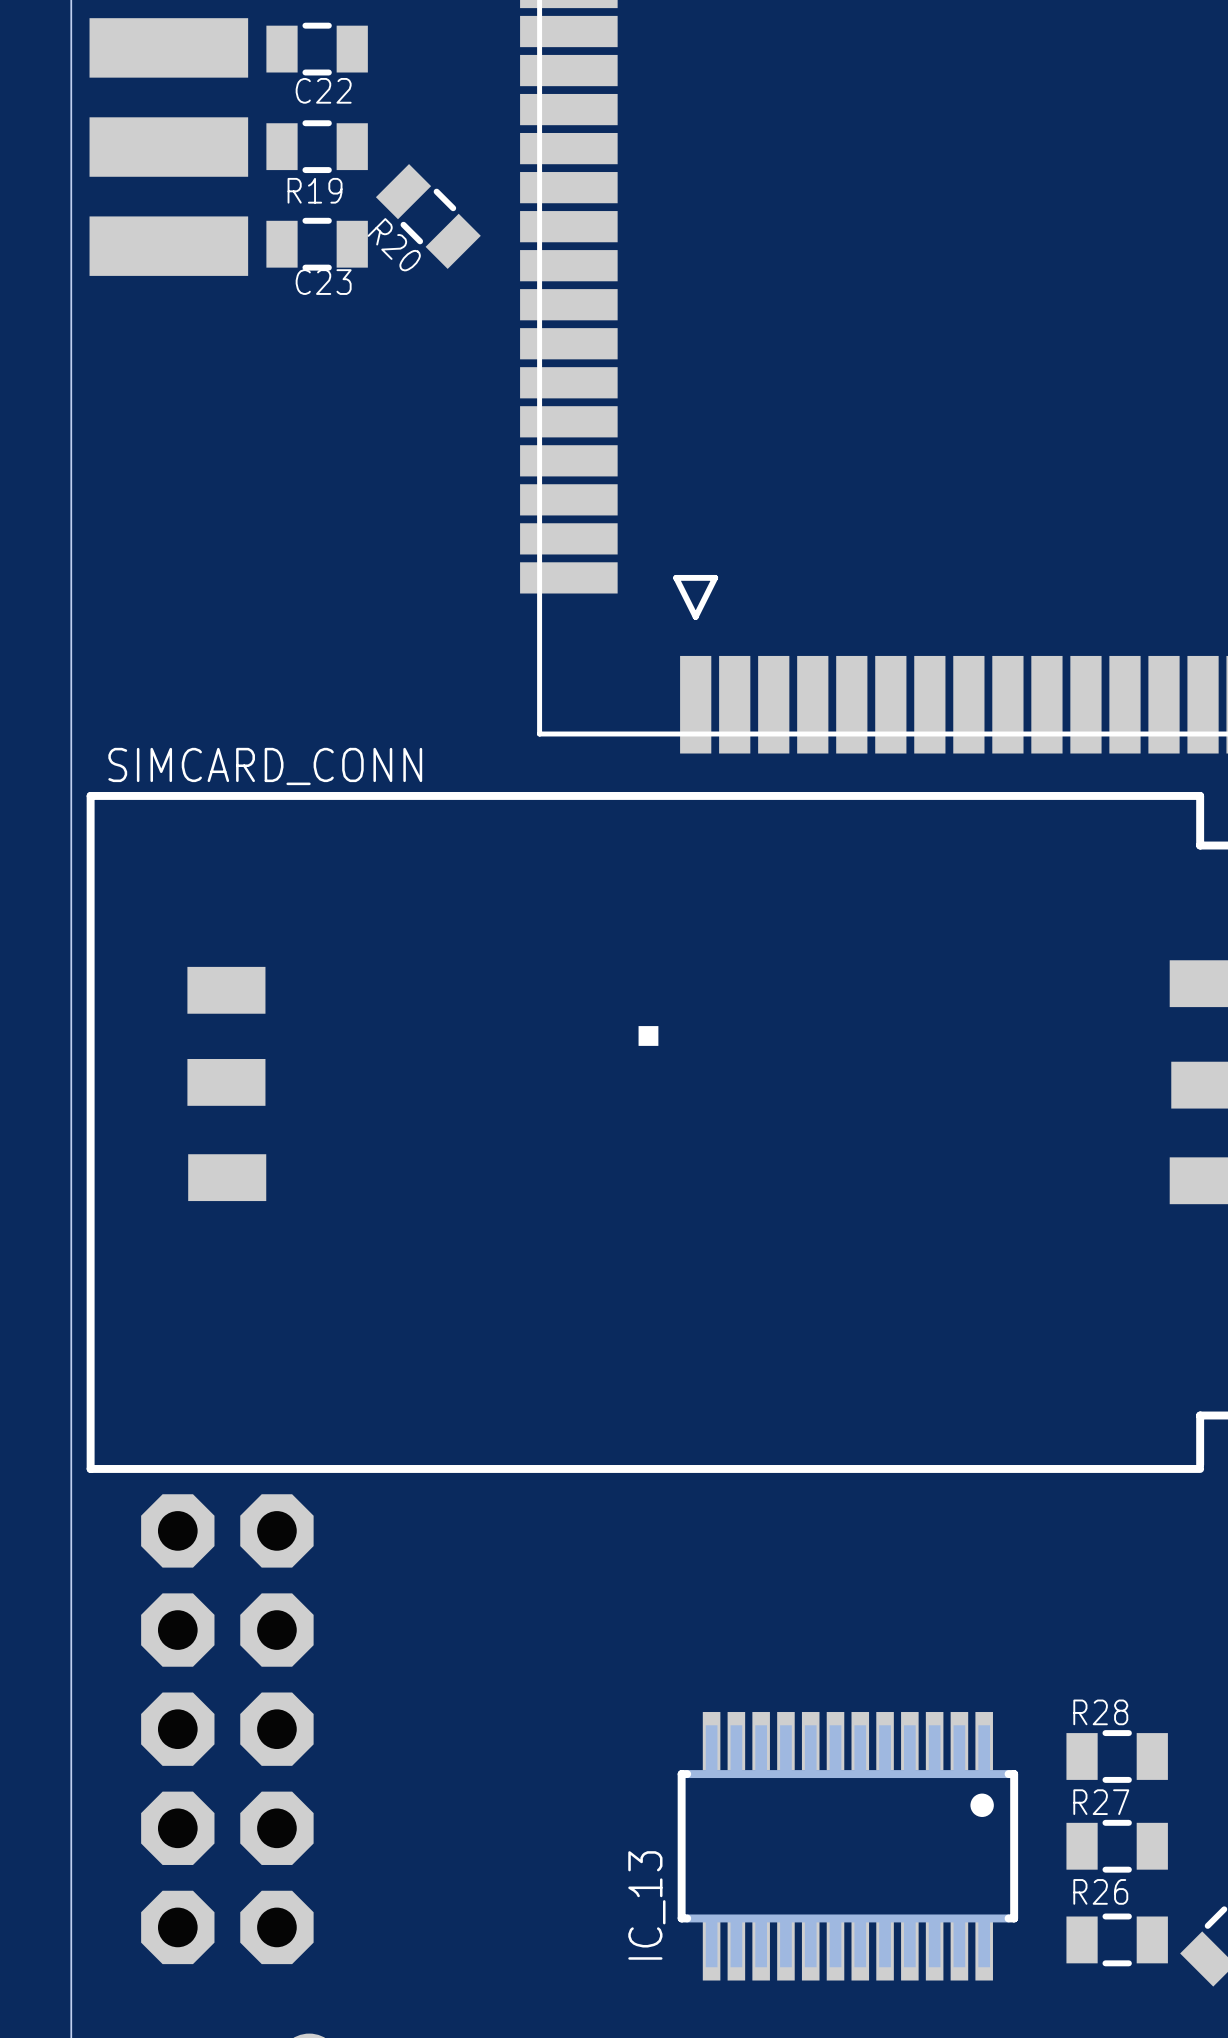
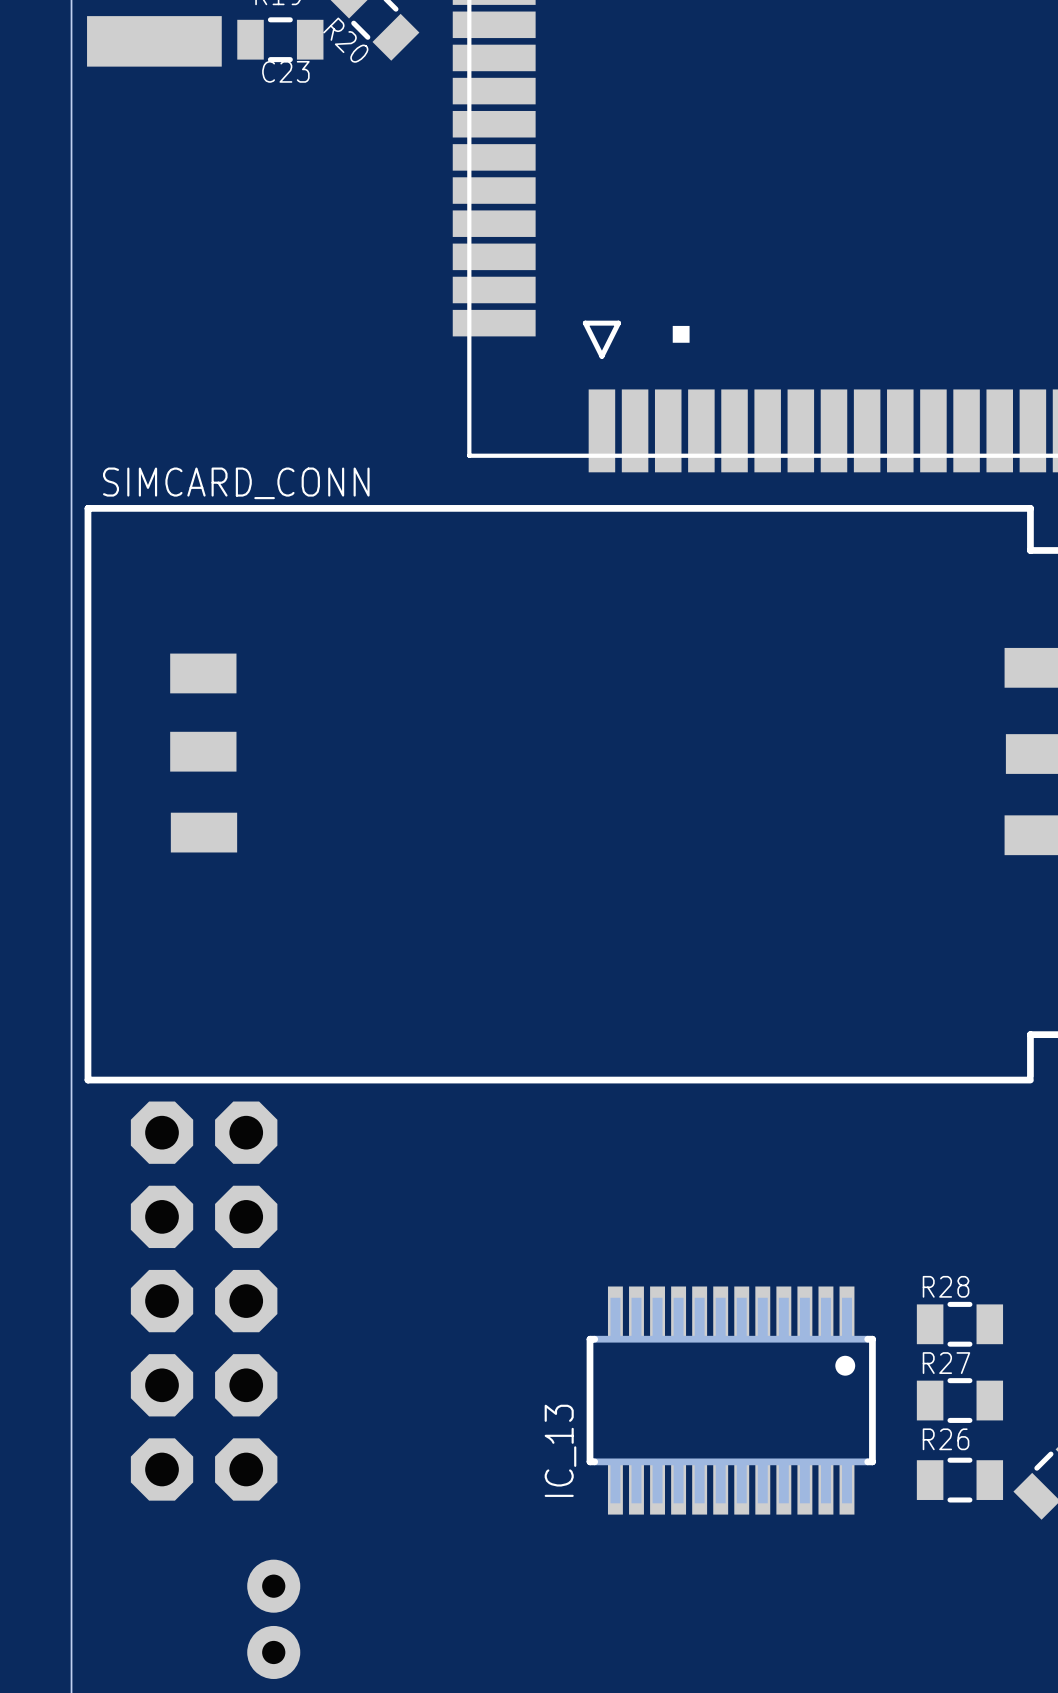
part position: (648, 1035) -> (681, 334)

